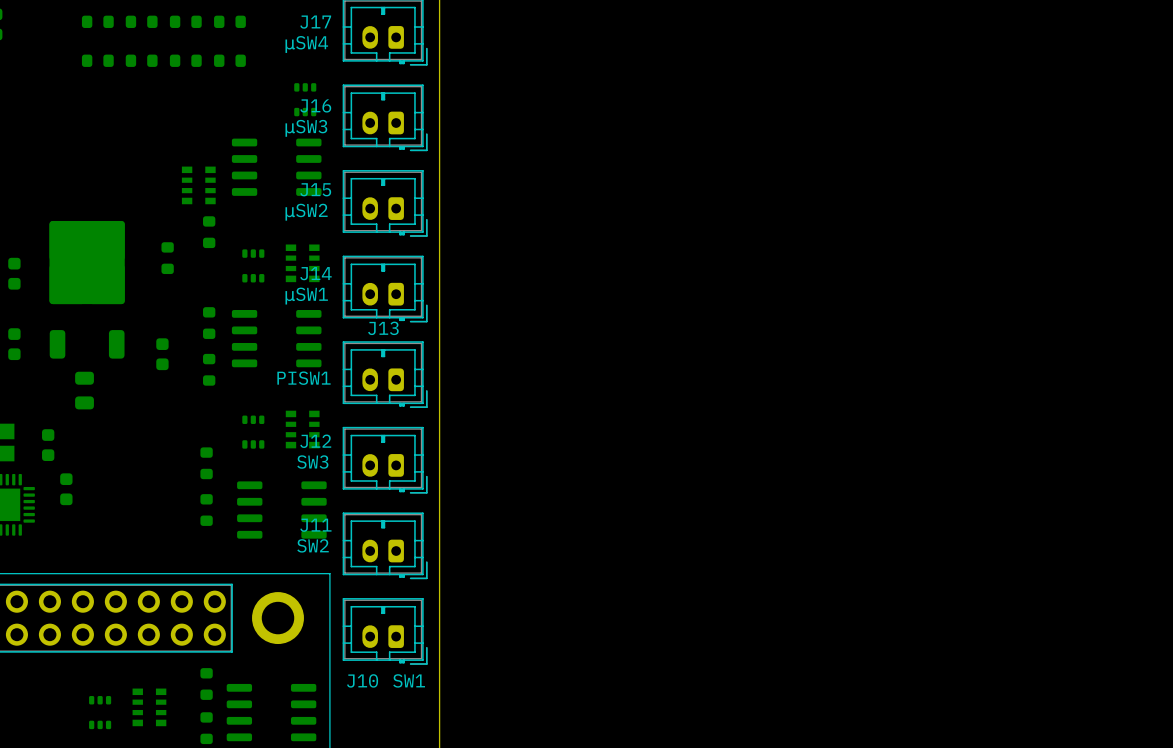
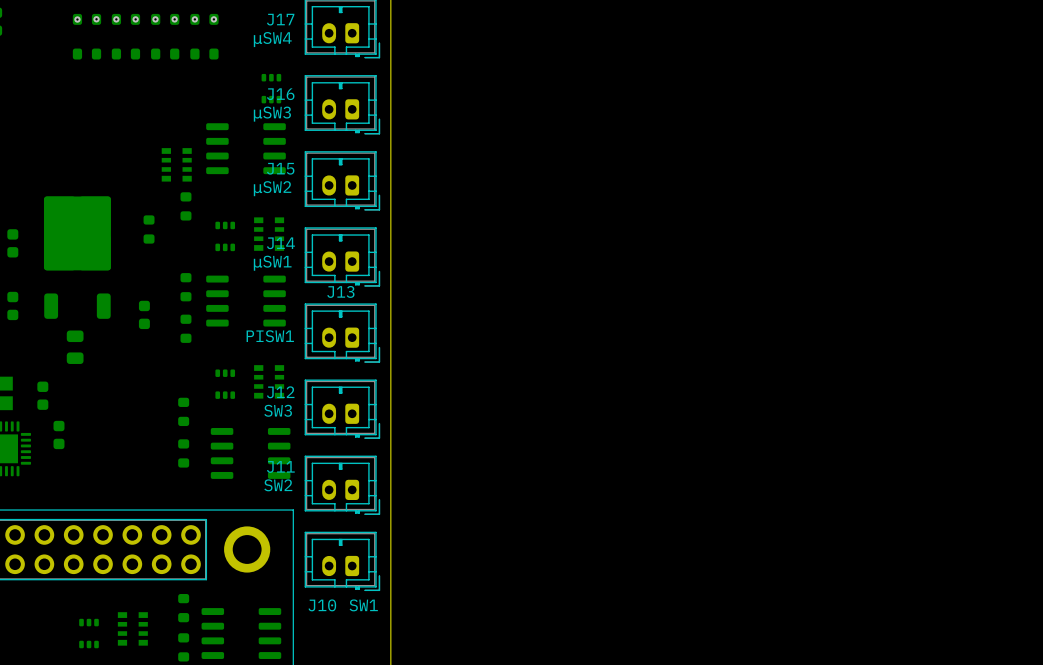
via: none -> (77, 19)
via: none -> (96, 19)
via: none -> (116, 19)
via: none -> (135, 19)
via: none -> (155, 19)
via: none -> (174, 19)
via: none -> (194, 19)
via: none -> (213, 19)

